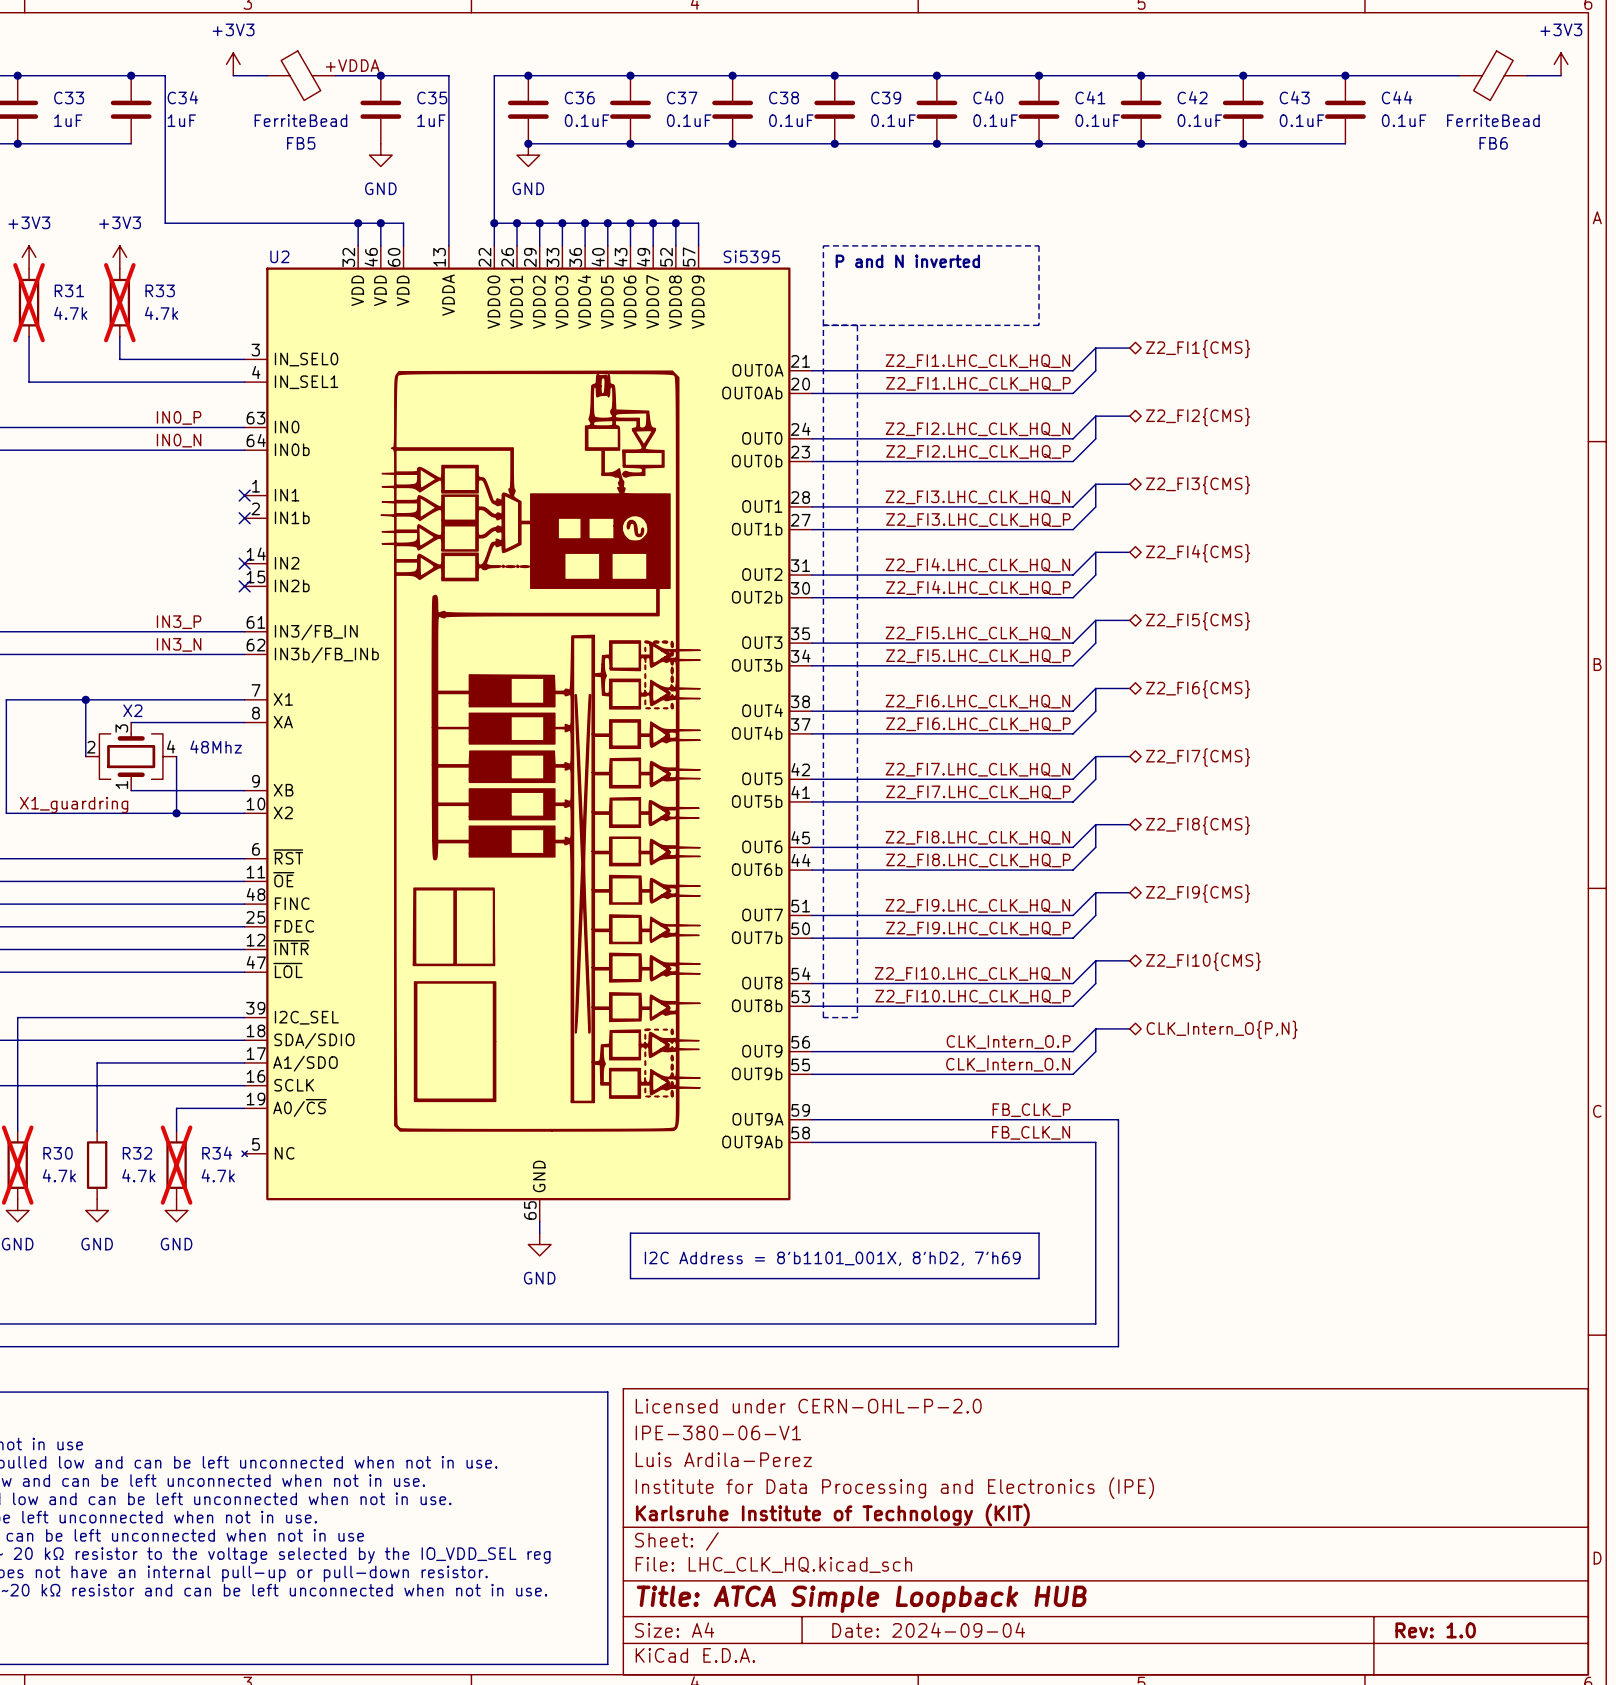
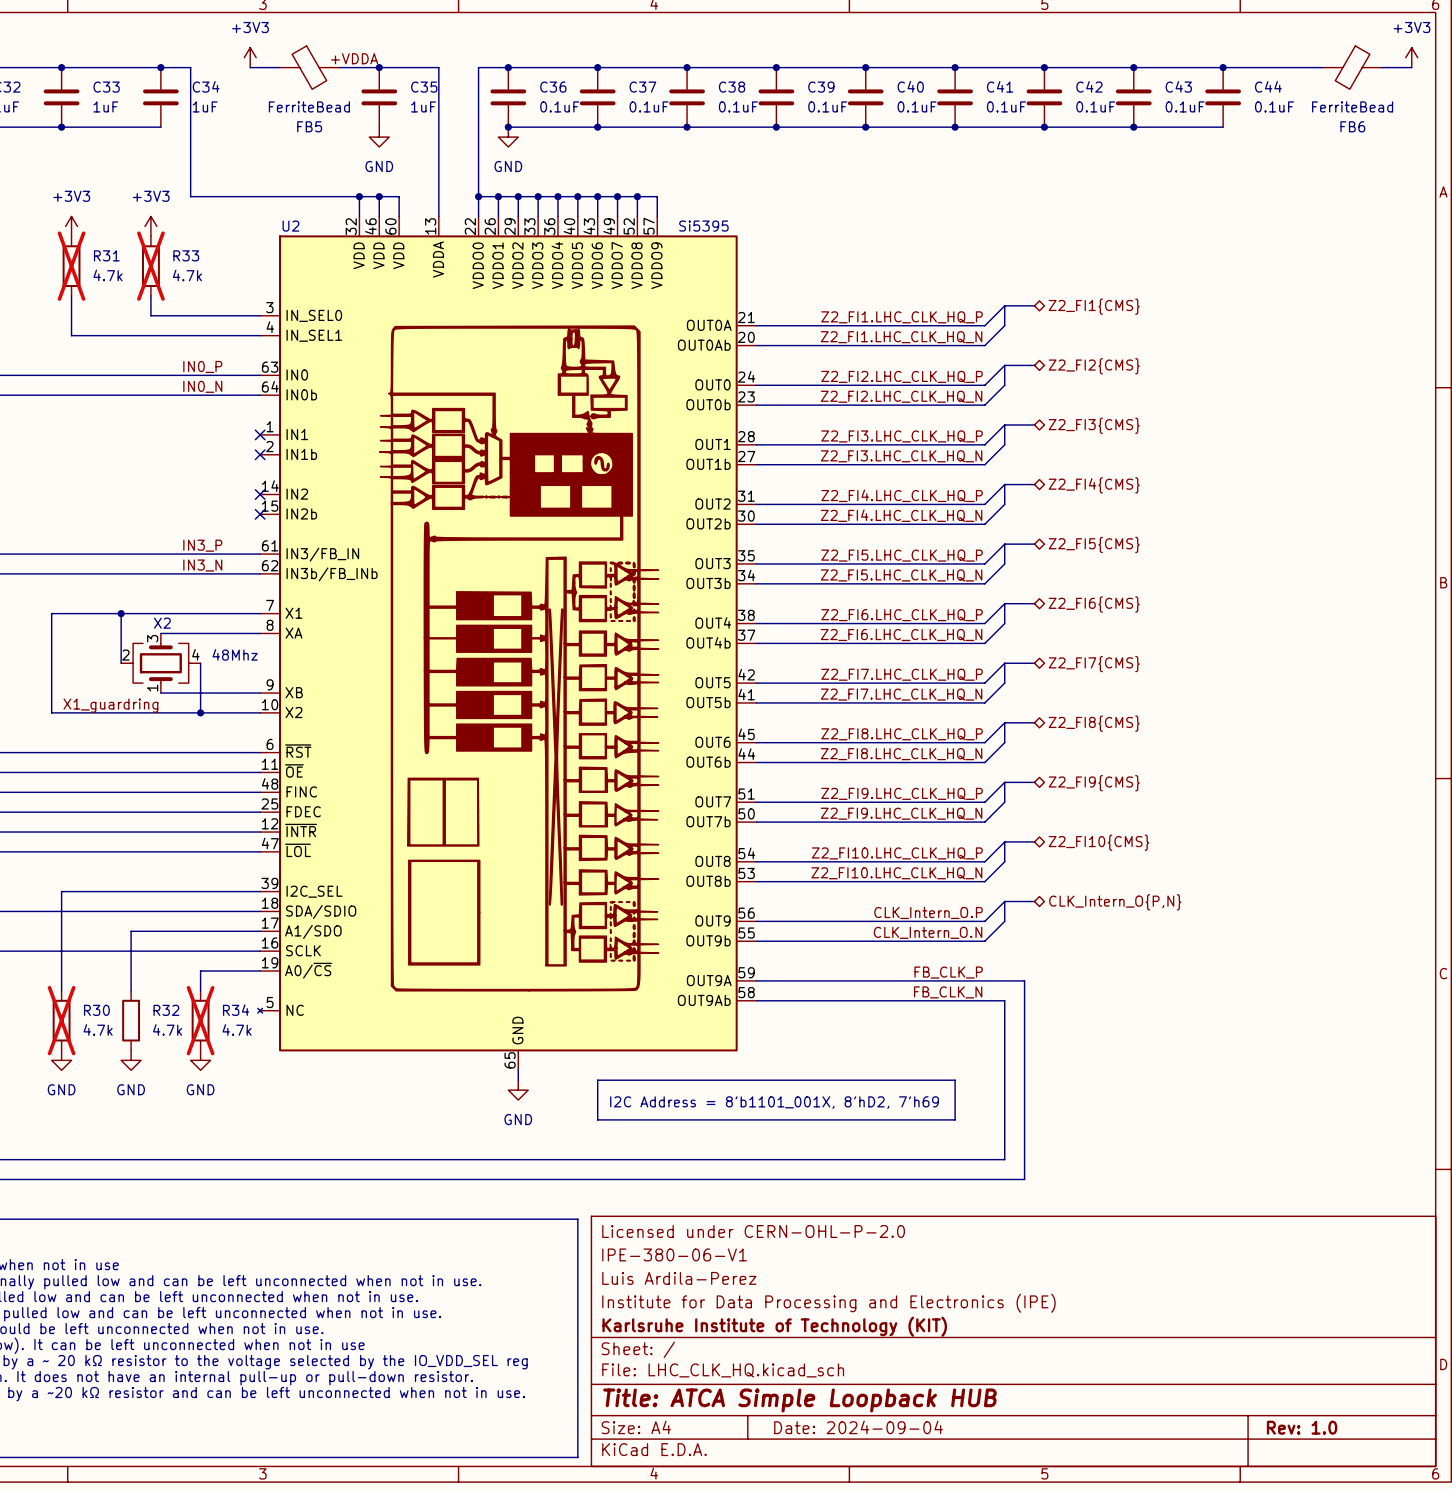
text: P and N inverted (907, 261) -> none
line: (823, 325) (1039, 325) (1039, 245) (823, 245) (823, 1017) (857, 1017) (857, 325) -> none
label: Z2_FI1.LHC_CLK_HQ_N (977, 361) -> Z2_FI1.LHC_CLK_HQ_P (902, 317)
label: Z2_FI1.LHC_CLK_HQ_P (978, 383) -> Z2_FI1.LHC_CLK_HQ_N (901, 337)
label: Z2_FI2.LHC_CLK_HQ_N (977, 429) -> Z2_FI2.LHC_CLK_HQ_P (902, 376)
label: Z2_FI2.LHC_CLK_HQ_P (978, 451) -> Z2_FI2.LHC_CLK_HQ_N (901, 396)
label: Z2_FI3.LHC_CLK_HQ_N (977, 497) -> Z2_FI3.LHC_CLK_HQ_P (902, 436)
label: Z2_FI3.LHC_CLK_HQ_P (978, 520) -> Z2_FI3.LHC_CLK_HQ_N (901, 456)
label: Z2_FI4.LHC_CLK_HQ_N (977, 565) -> Z2_FI4.LHC_CLK_HQ_P (902, 495)
label: Z2_FI4.LHC_CLK_HQ_P (978, 587) -> Z2_FI4.LHC_CLK_HQ_N (901, 515)
label: Z2_FI5.LHC_CLK_HQ_N (977, 633) -> Z2_FI5.LHC_CLK_HQ_P (902, 555)
label: Z2_FI5.LHC_CLK_HQ_P (978, 656) -> Z2_FI5.LHC_CLK_HQ_N (901, 575)
label: Z2_FI6.LHC_CLK_HQ_N (977, 701) -> Z2_FI6.LHC_CLK_HQ_P (902, 615)
label: Z2_FI6.LHC_CLK_HQ_P (978, 724) -> Z2_FI6.LHC_CLK_HQ_N (901, 635)
label: Z2_FI7.LHC_CLK_HQ_N (977, 769) -> Z2_FI7.LHC_CLK_HQ_P (902, 674)
label: Z2_FI7.LHC_CLK_HQ_P (978, 792) -> Z2_FI7.LHC_CLK_HQ_N (901, 694)
label: Z2_FI8.LHC_CLK_HQ_N (977, 837) -> Z2_FI8.LHC_CLK_HQ_P (902, 734)
label: Z2_FI8.LHC_CLK_HQ_P (978, 860) -> Z2_FI8.LHC_CLK_HQ_N (901, 754)
label: Z2_FI9.LHC_CLK_HQ_N (977, 905) -> Z2_FI9.LHC_CLK_HQ_P (902, 793)
label: Z2_FI9.LHC_CLK_HQ_P (978, 928) -> Z2_FI9.LHC_CLK_HQ_N (901, 813)
label: Z2_FI10.LHC_CLK_HQ_N (972, 973) -> Z2_FI10.LHC_CLK_HQ_P (897, 853)
label: Z2_FI10.LHC_CLK_HQ_P (973, 996) -> Z2_FI10.LHC_CLK_HQ_N (896, 873)

